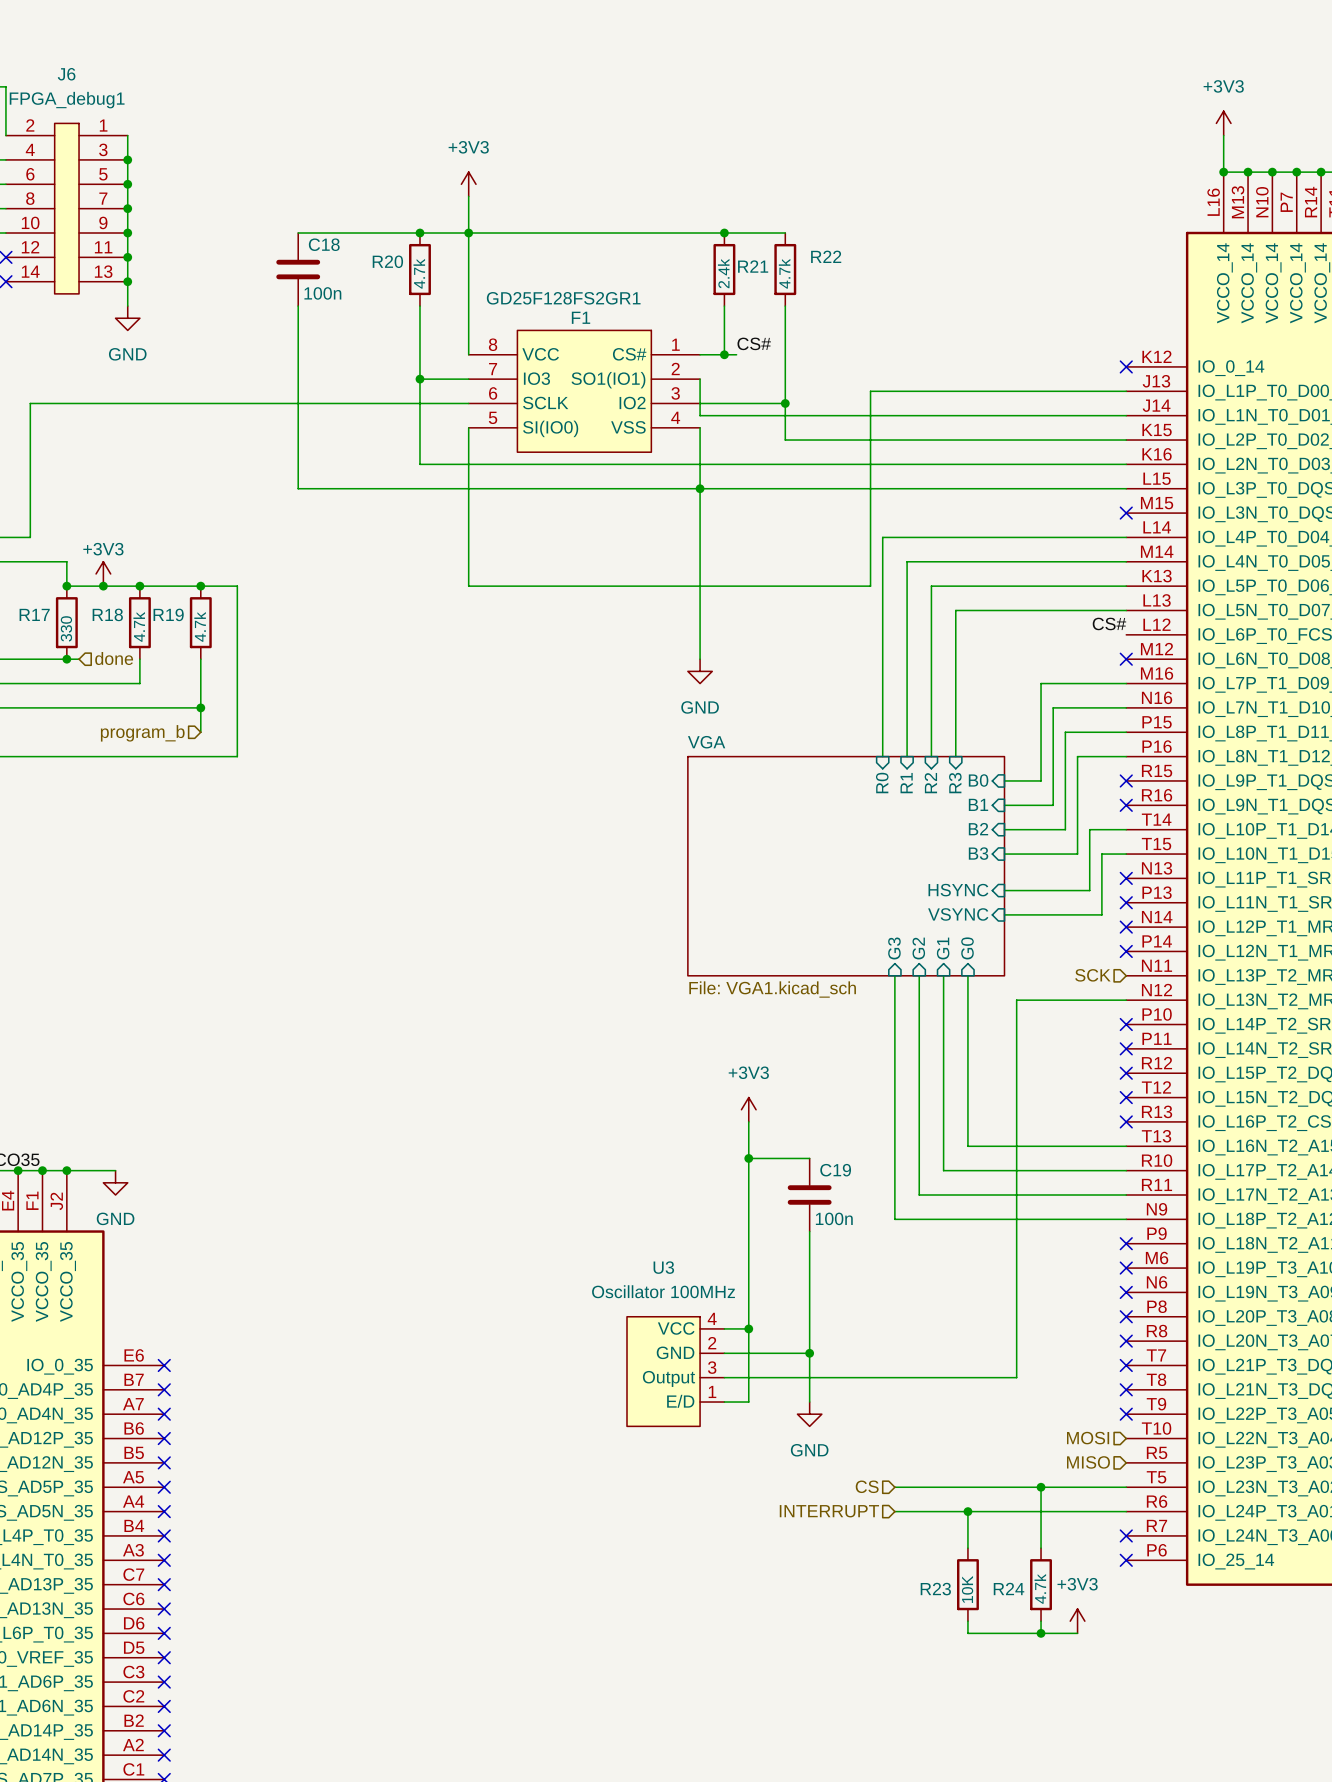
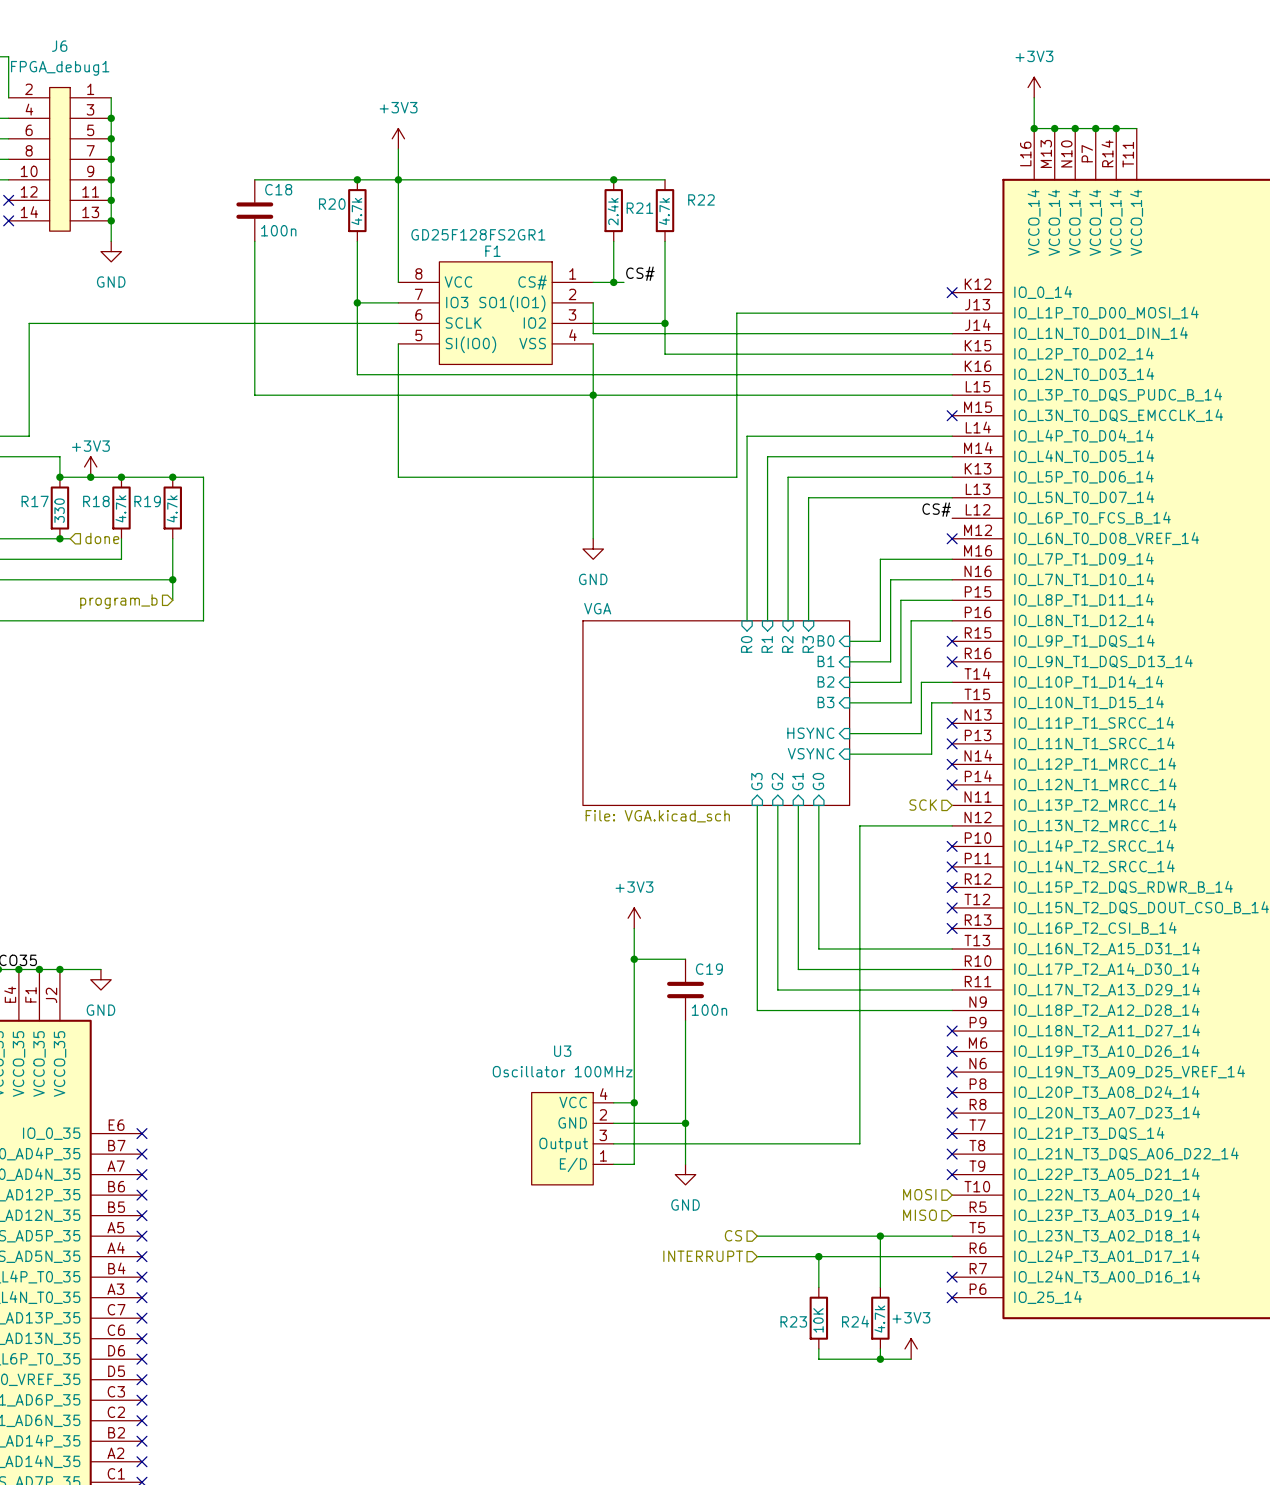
sheet VGA value: File: VGA1.kicad_sch (772, 989) -> File: VGA.kicad_sch (657, 816)

